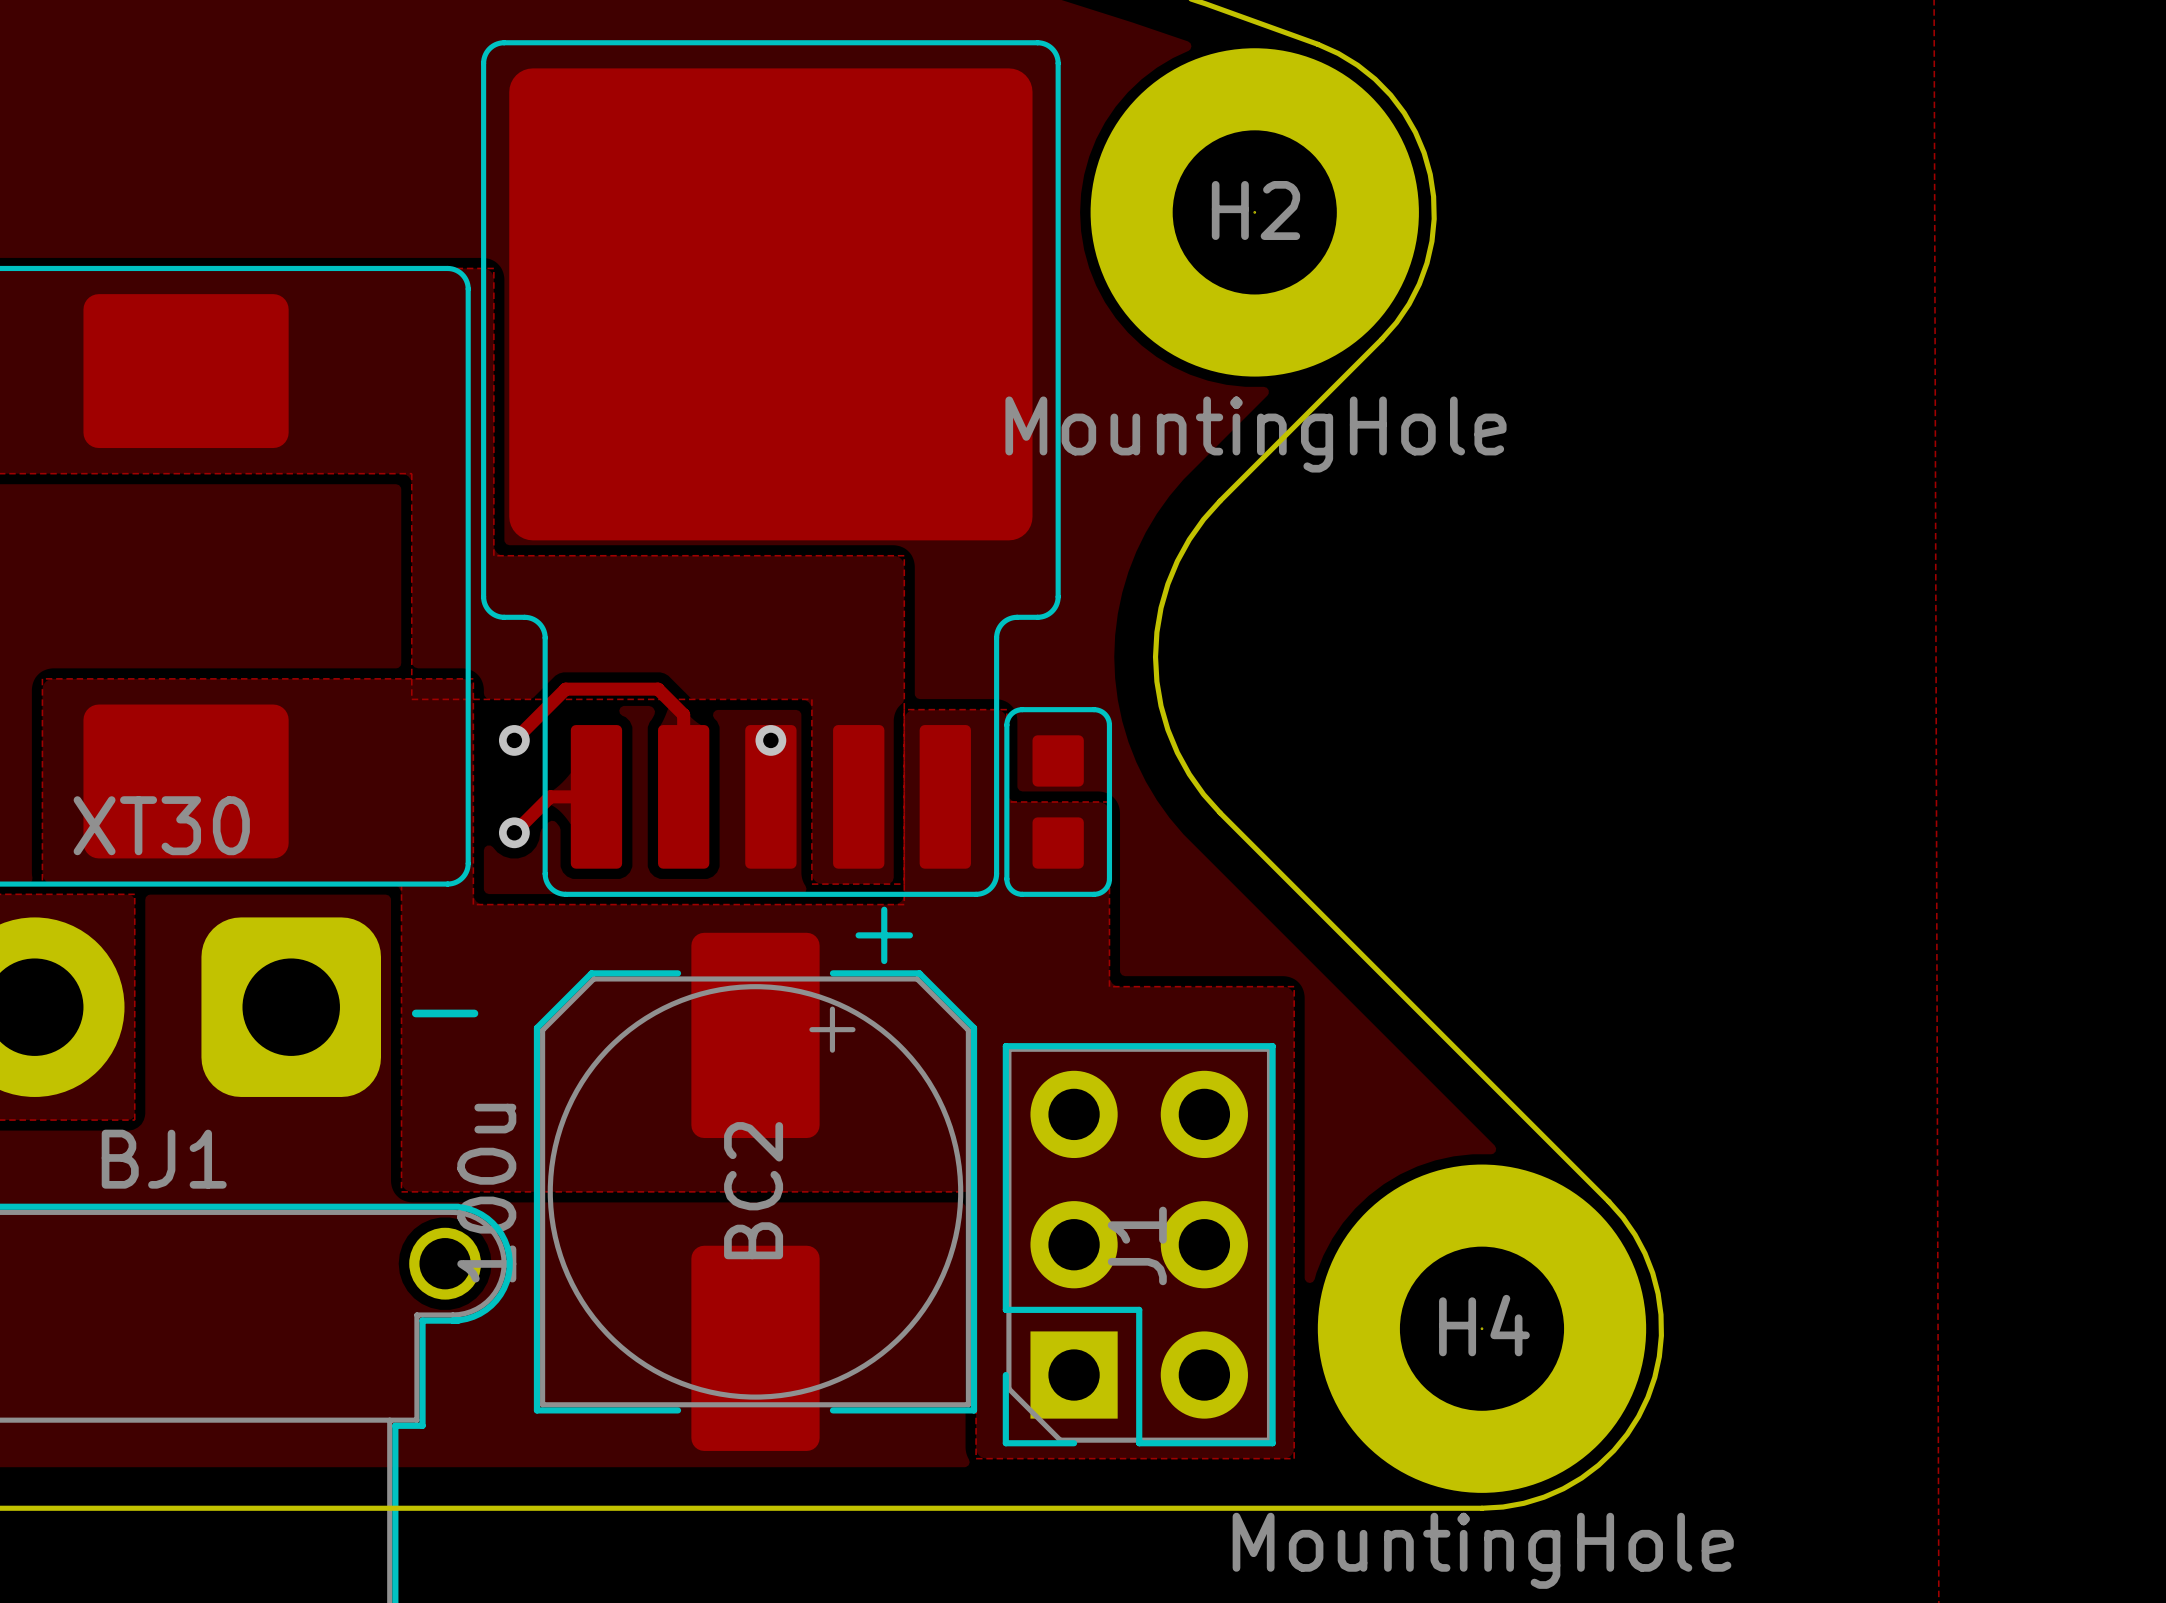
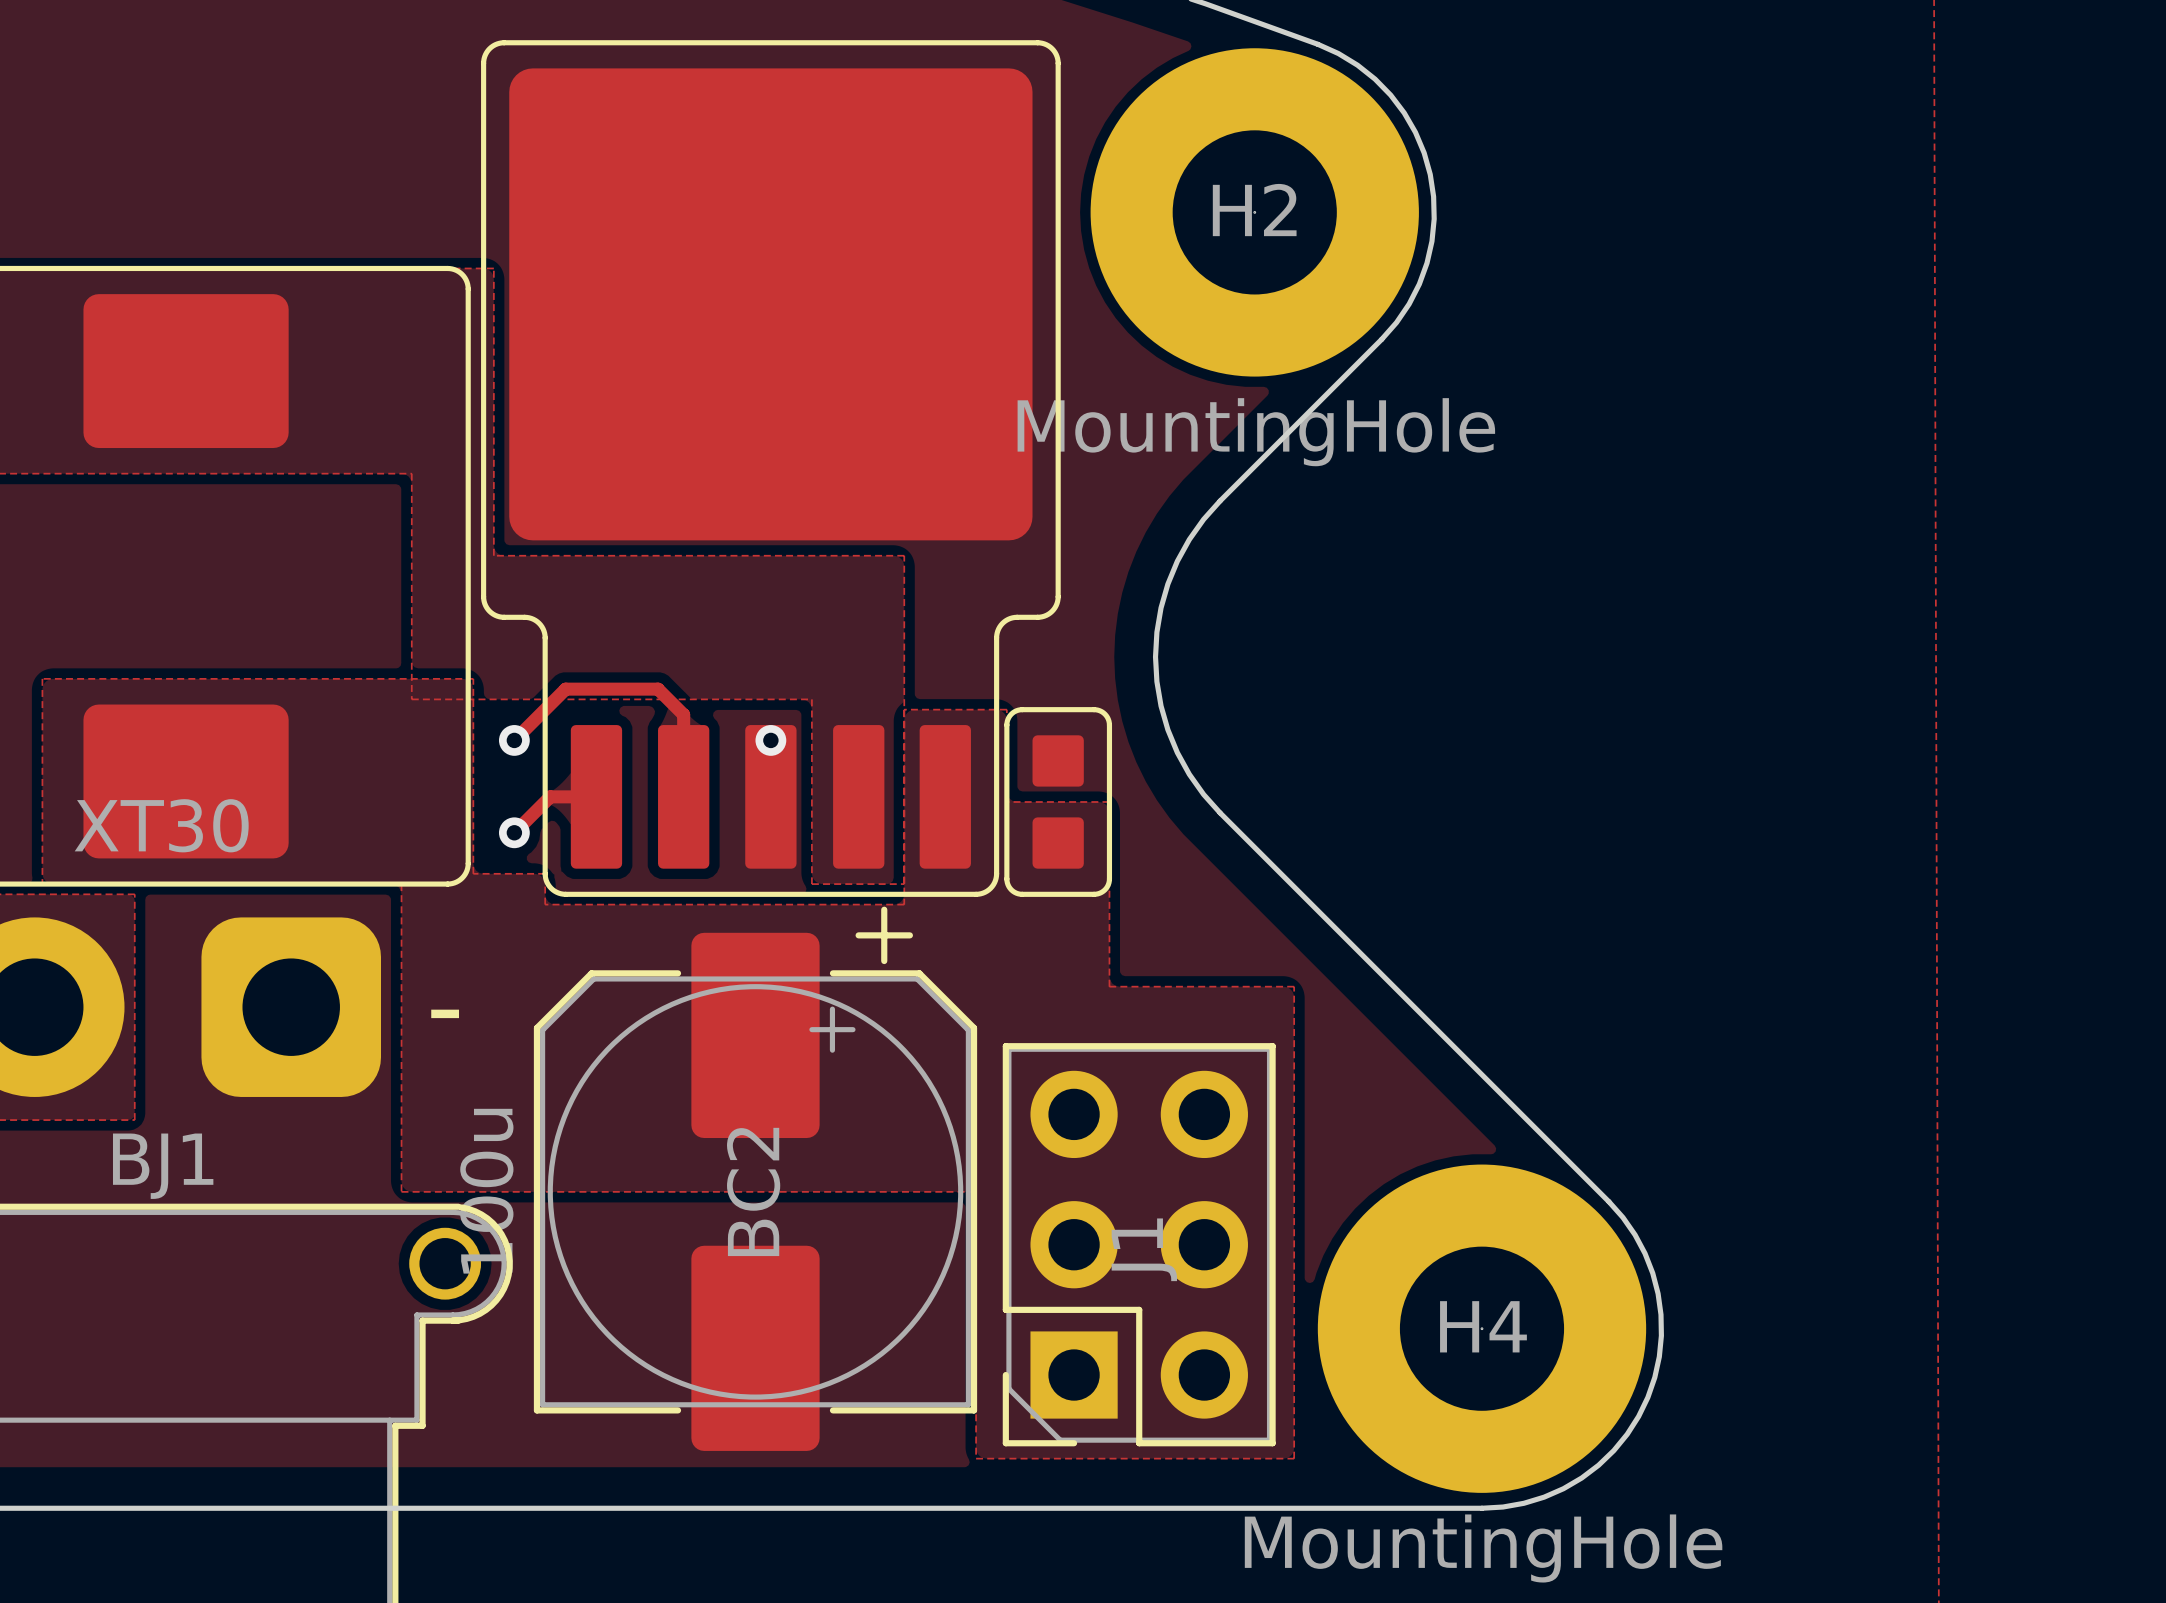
zone outline: (473, 873) (473, 904) (545, 904) -> (473, 873) (545, 873) (545, 904)

